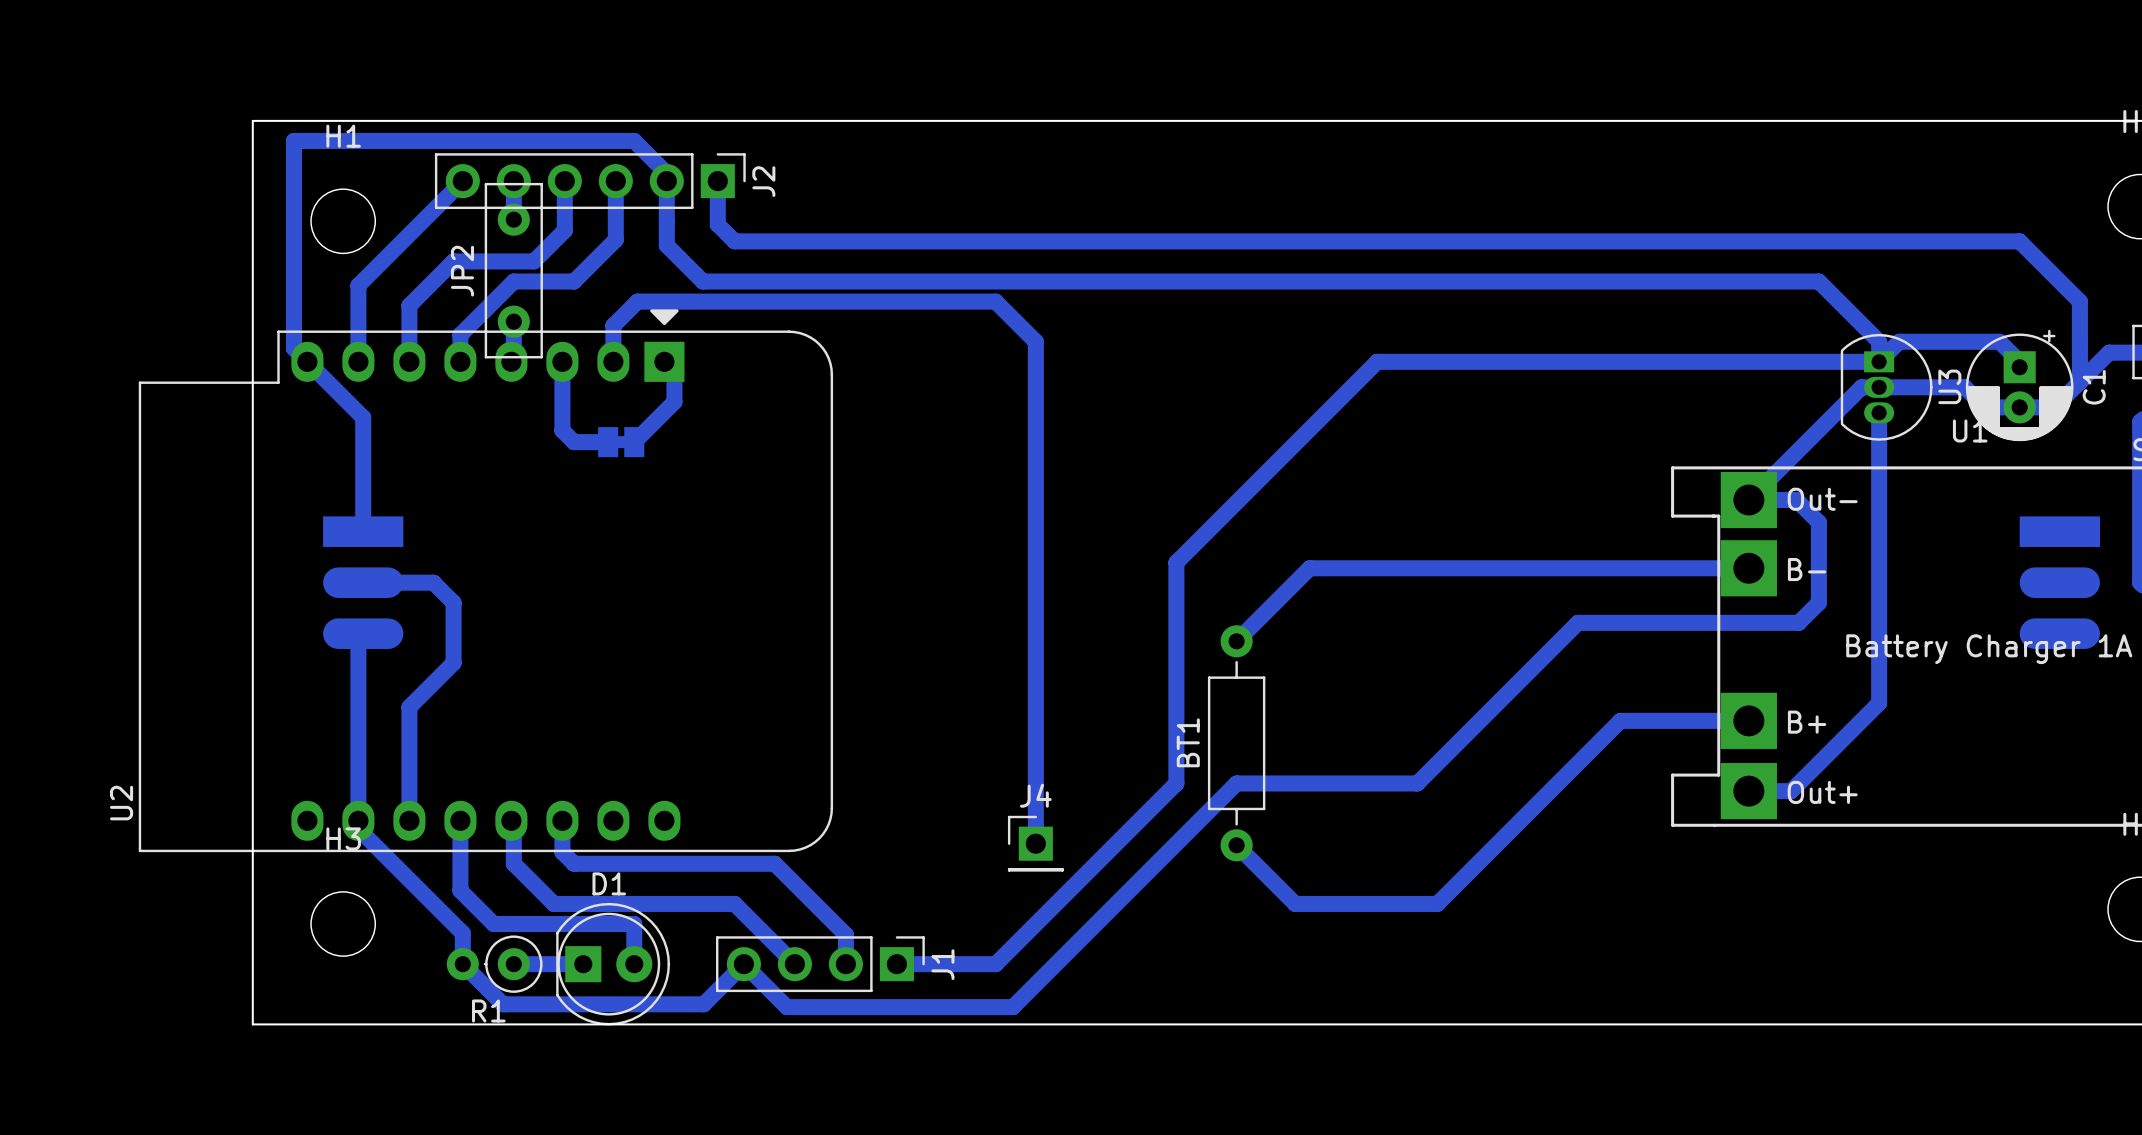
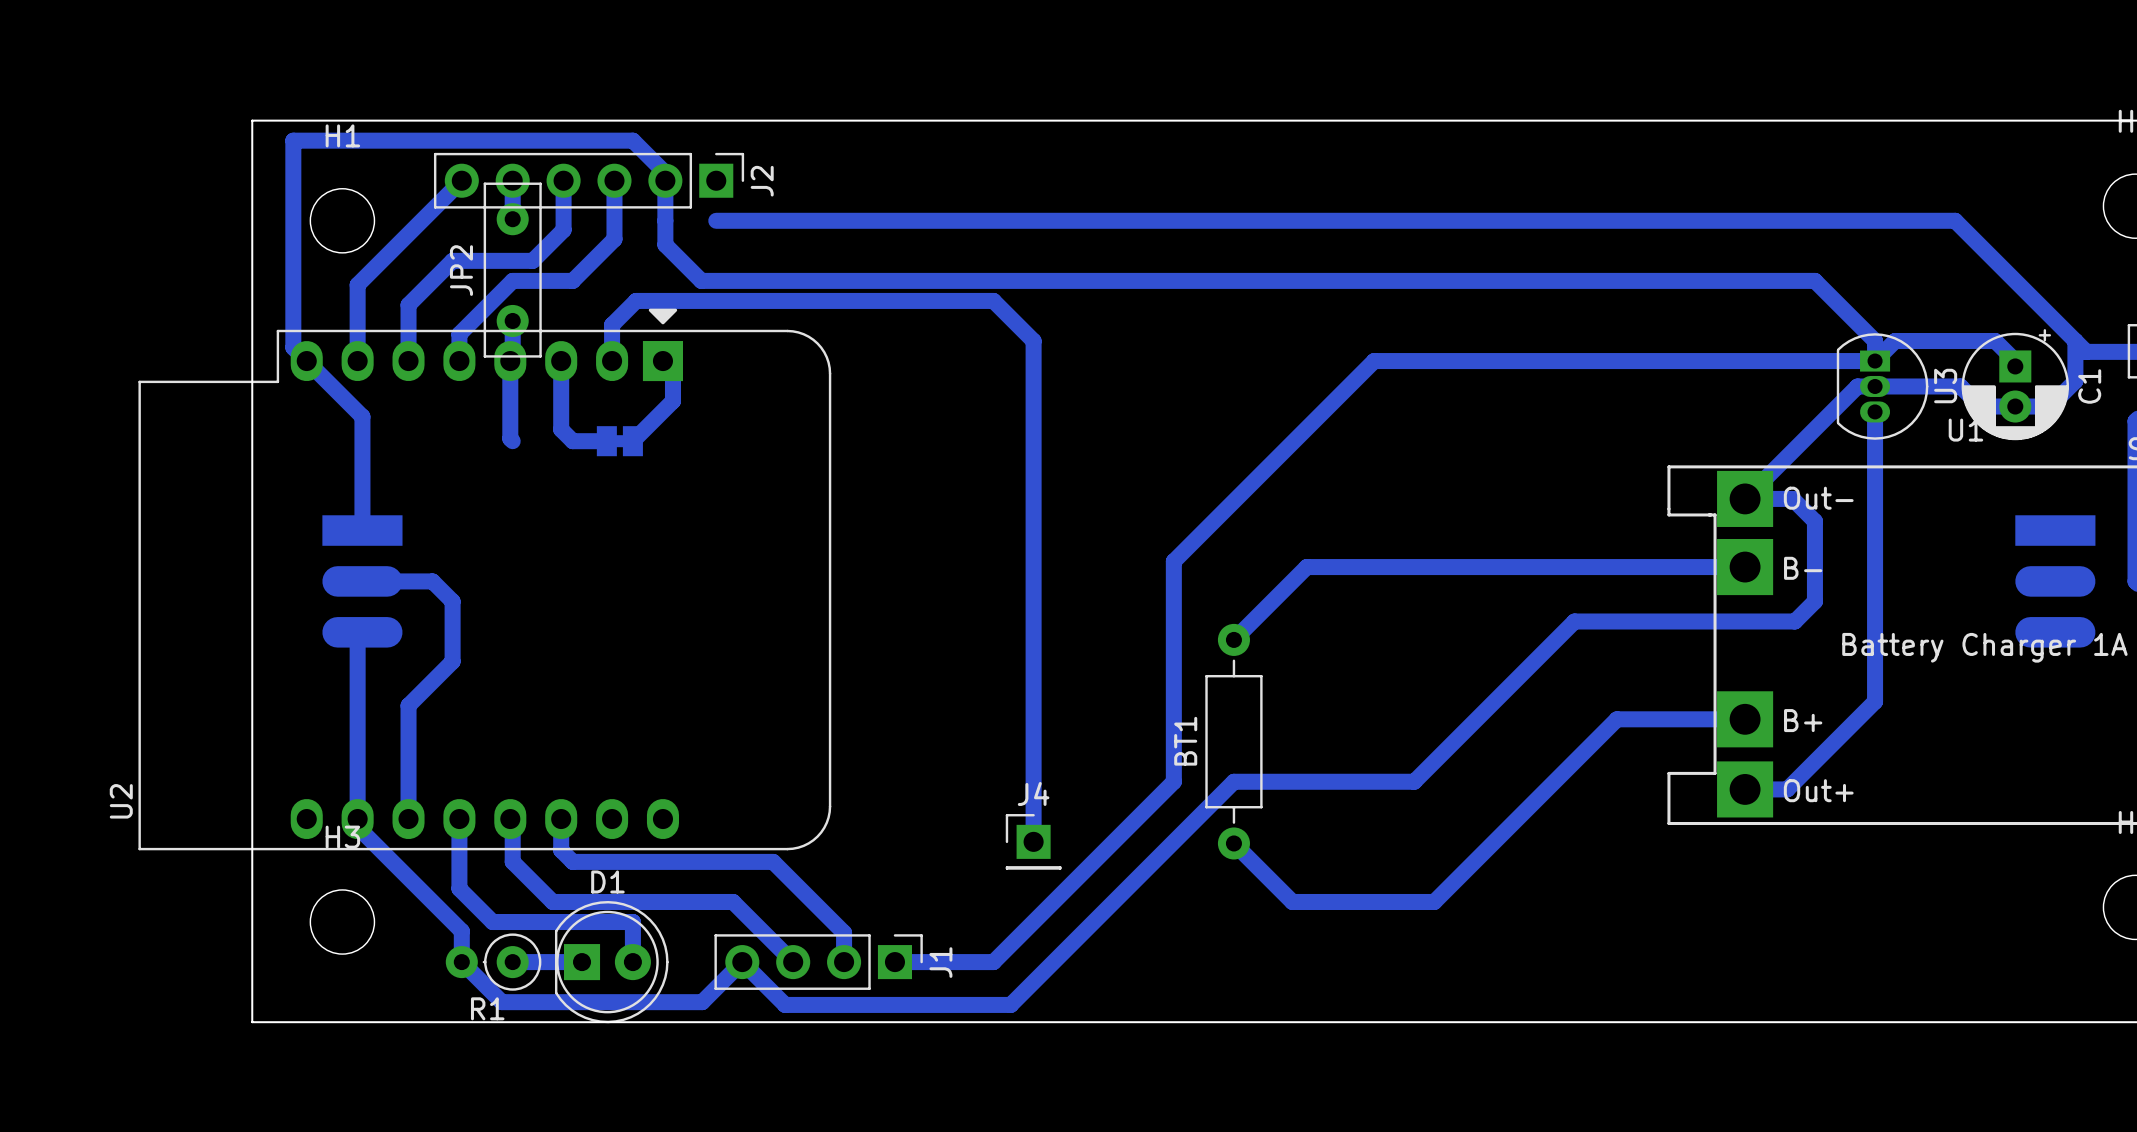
bottom track: (717, 181) (717, 224) (734, 241) (2019, 241) (2079, 301) (2079, 341) -> none
bottom track: (2109, 352) (2079, 381) -> (2104, 351) (2086, 351) (1955, 220) (716, 220)
bottom track: none -> (510, 361) (510, 438) (512, 441)

